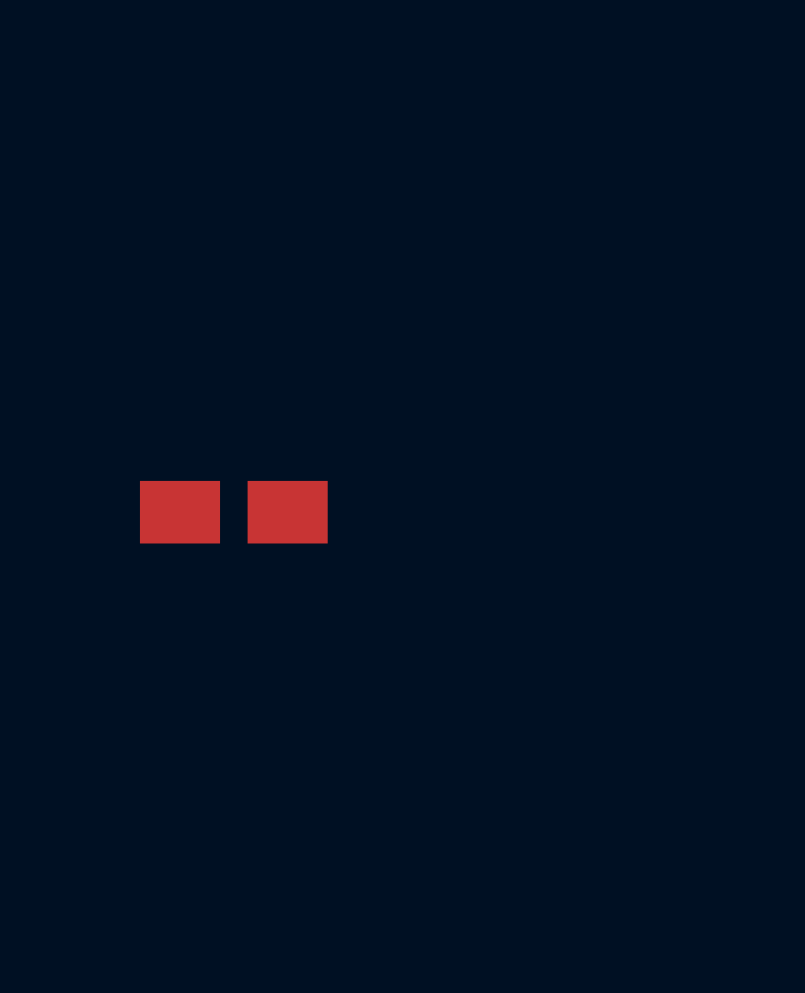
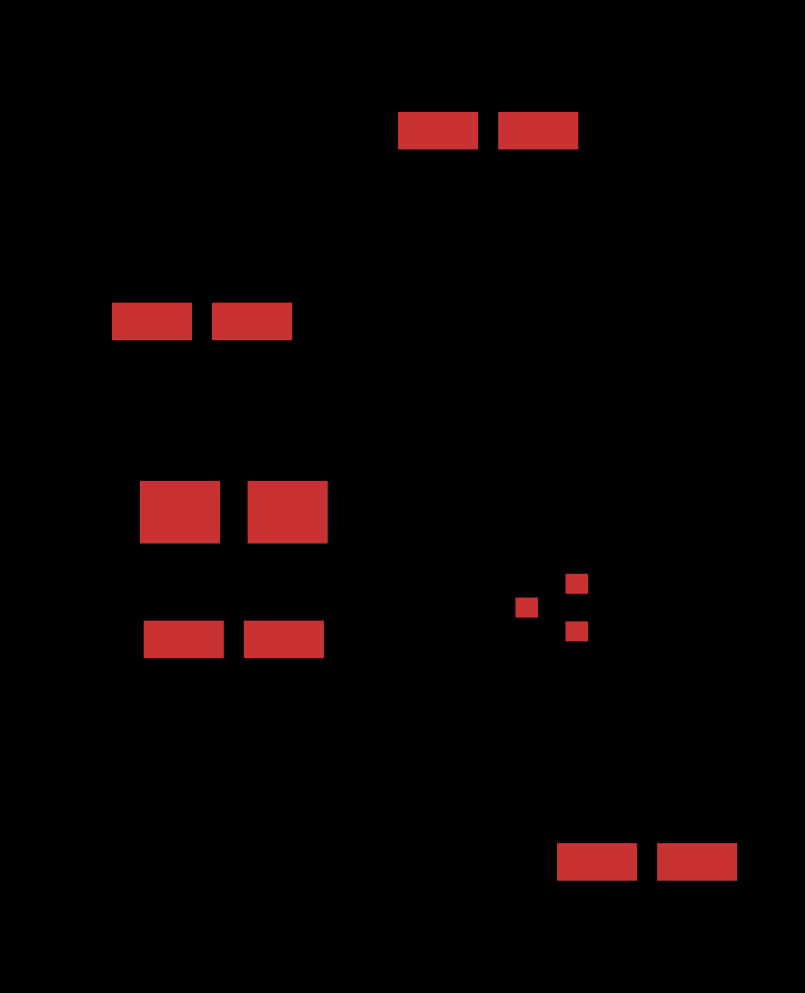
part: none -> (488, 130)
part: none -> (202, 321)
part: none -> (551, 607)
part: none -> (233, 639)
part: none -> (647, 861)

